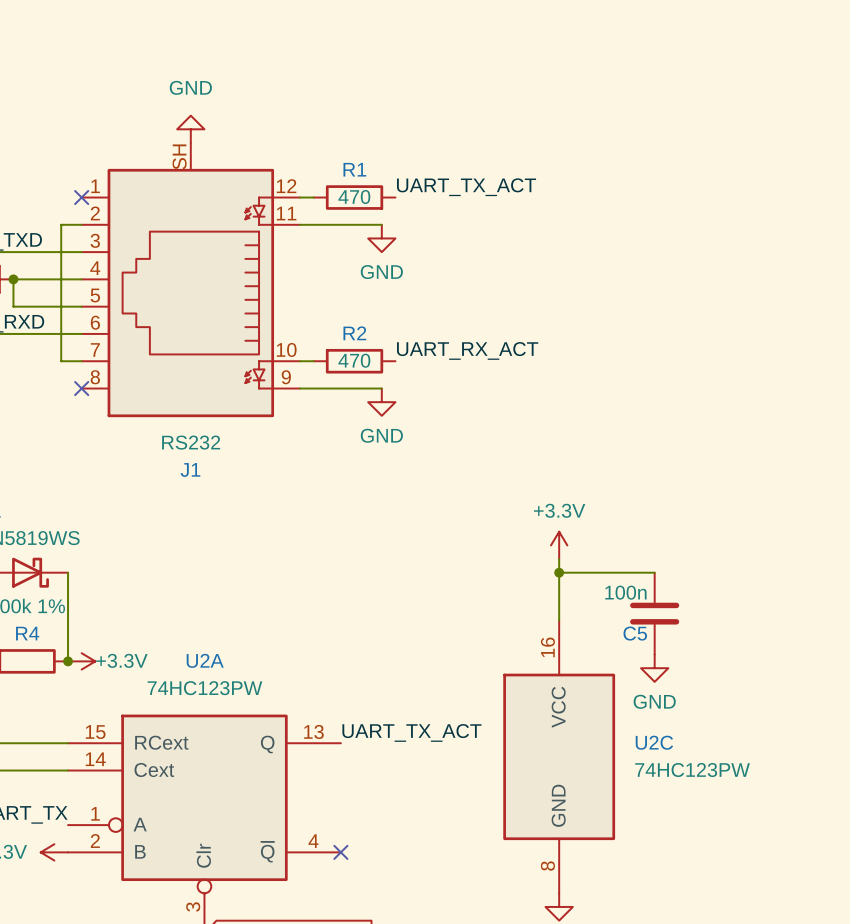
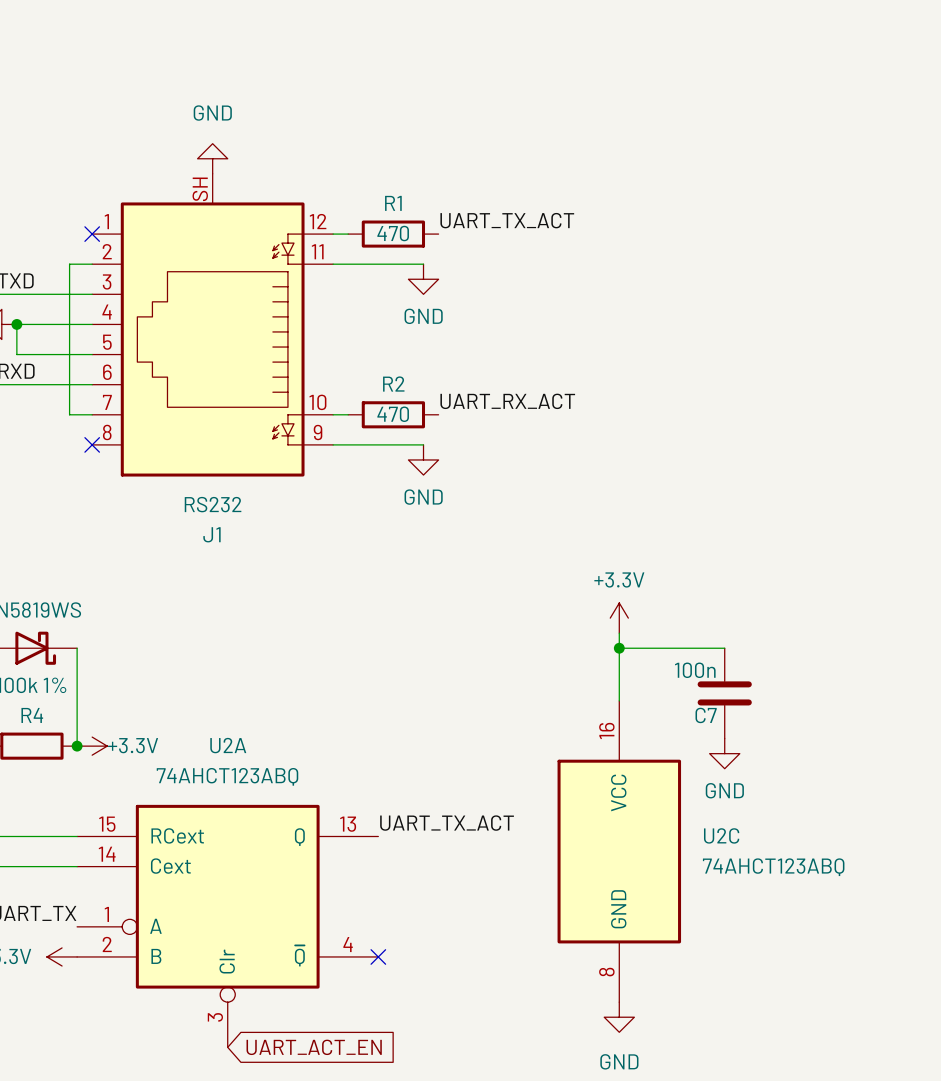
C5 name: C5 (635, 633) -> C7 (706, 715)
U2A value: 74HC123PW (204, 688) -> 74AHCT123ABQ (227, 776)
U2C value: 74HC123PW (692, 770) -> 74AHCT123ABQ (773, 867)

